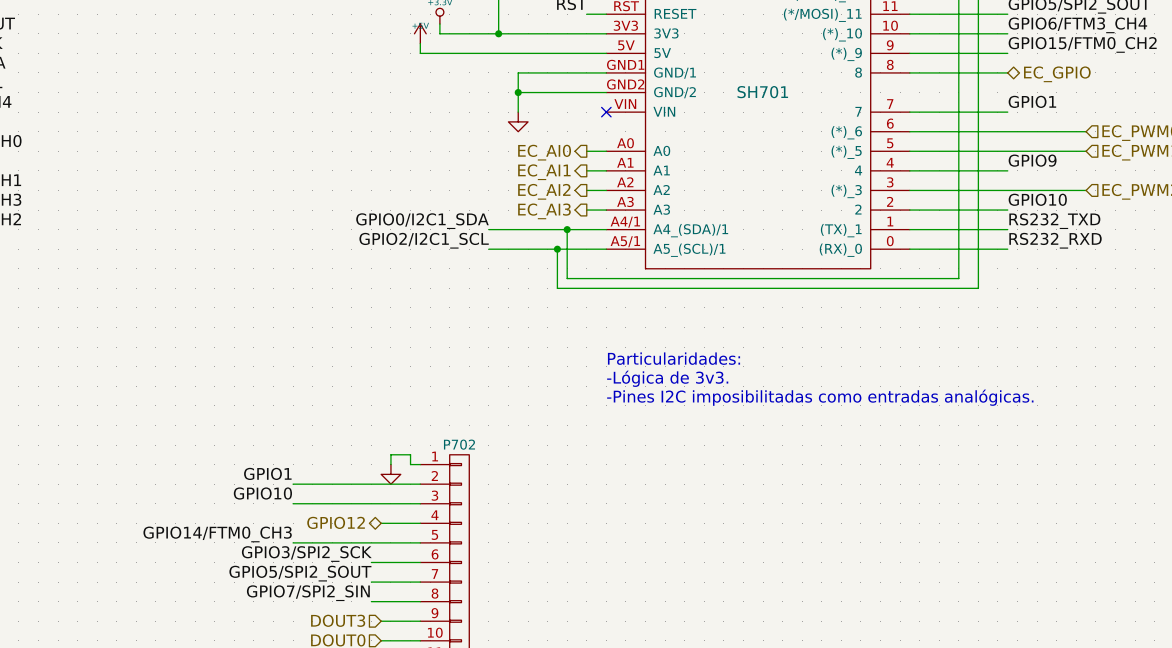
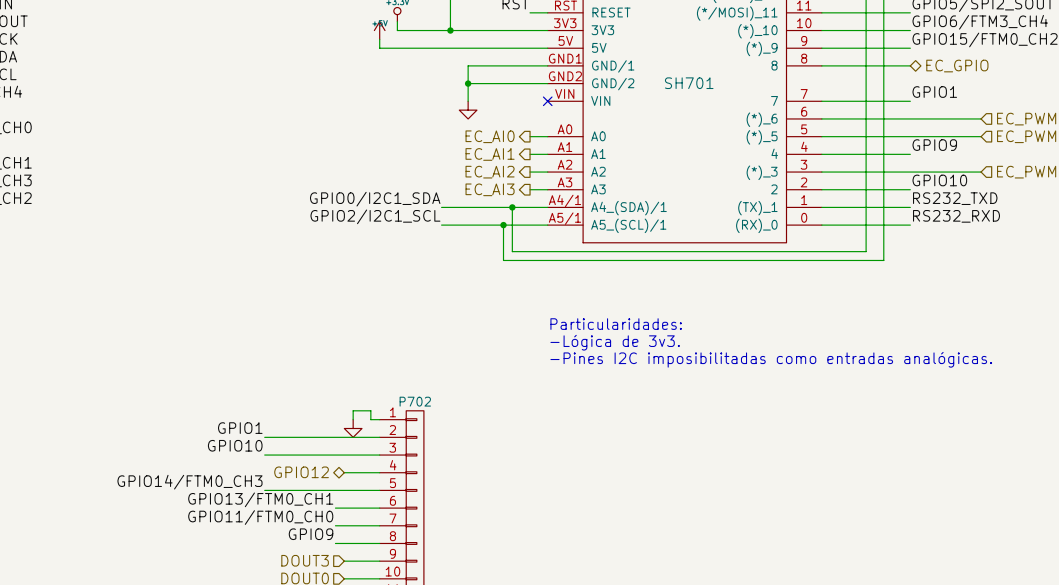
label: GPIO3/SPI2_SCK (306, 554) -> GPIO13/FTM0_CH1 (260, 499)
label: GPIO5/SPI2_SOUT (300, 573) -> GPIO11/FTM0_CH0 (260, 517)
label: GPIO7/SPI2_SIN (308, 593) -> GPIO9 (311, 534)

